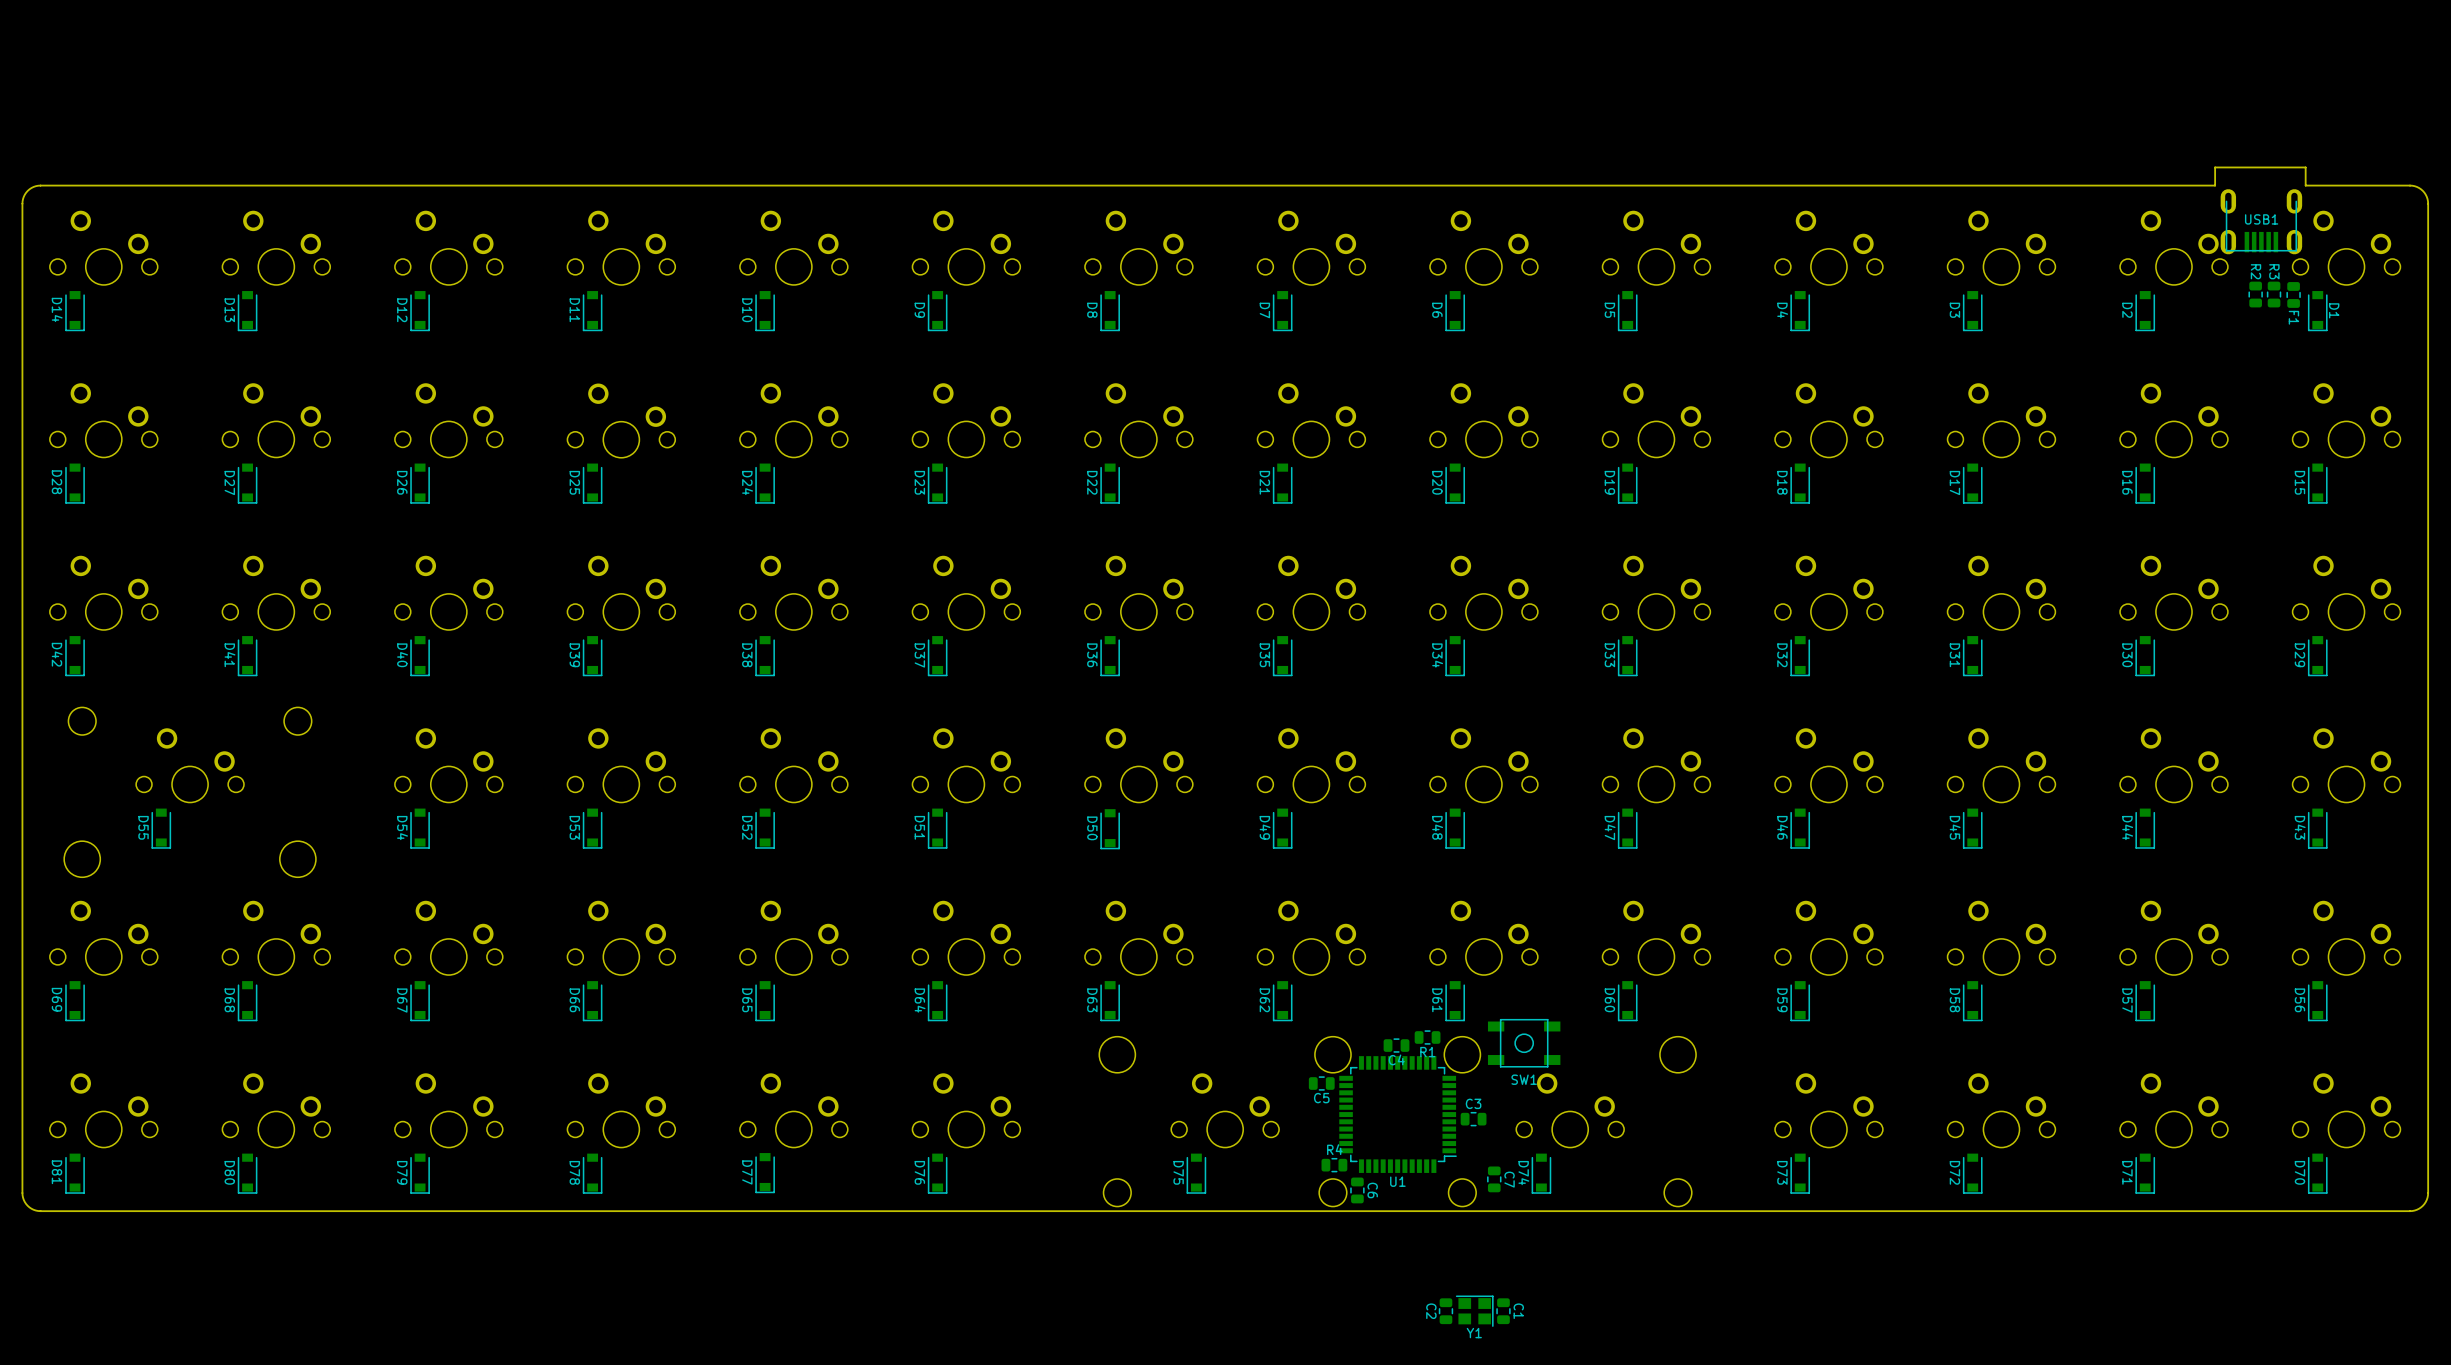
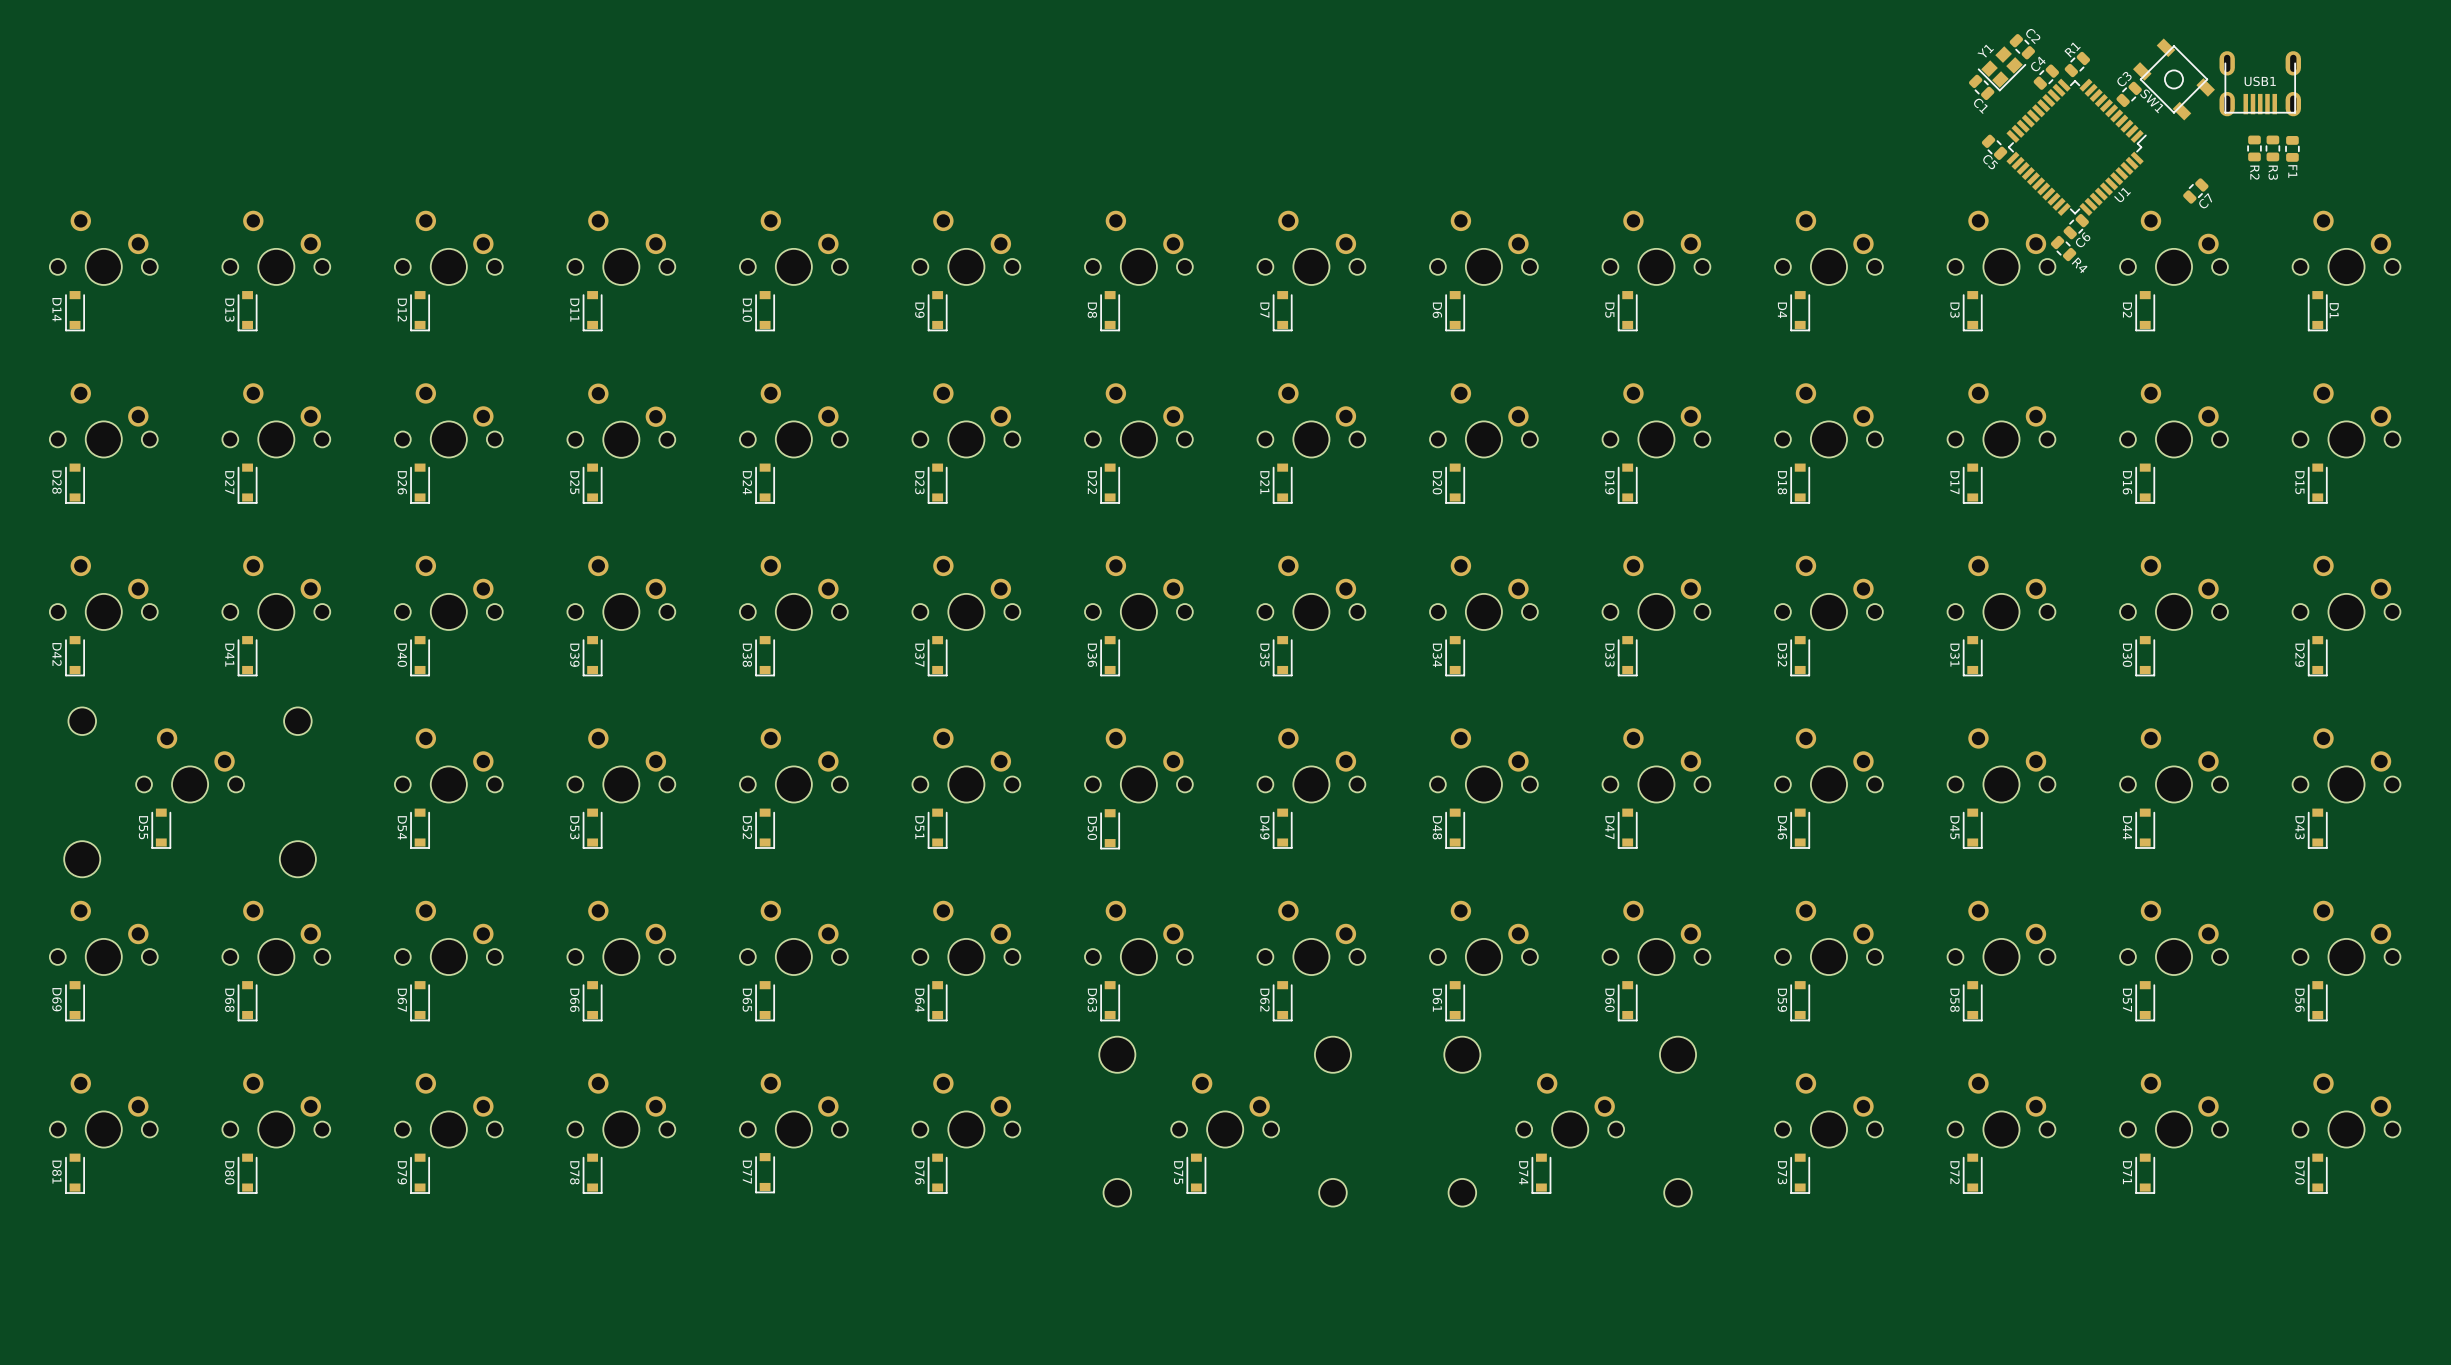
board edge: (2305, 167) (2305, 185) (2412, 185) (2422, 190) (2427, 201) (2428, 1193) (2425, 1202) (2416, 1209) (40, 1211) (29, 1207) (23, 1199) (22, 203) (26, 192) (33, 186) (2215, 185) (2215, 167) (2305, 167) -> none
USB1 position: (2261, 221) -> (2260, 83)
R2 name position: R2 (2255, 271) -> R2 (2254, 172)
R3 name position: R3 (2274, 271) -> R3 (2273, 172)
R2 position: (2255, 294) -> (2254, 148)
R3 position: (2274, 294) -> (2272, 148)
F1 position: (2293, 294) -> (2292, 148)
R1 rotation: 0° (1427, 1037) -> 45° counterclockwise (2077, 64)
R1 position: (1427, 1037) -> (2077, 64)
SW1 rotation: 0° (1524, 1043) -> 45° clockwise (2173, 79)
SW1 position: (1524, 1043) -> (2173, 79)
C4 rotation: 0° (1396, 1045) -> 45° counterclockwise (2046, 77)
C4 position: (1396, 1045) -> (2046, 77)
R1 name position: R1 (1427, 1052) -> R1 (2072, 49)
C4 name position: C4 (1396, 1059) -> C4 (2038, 63)
C5 rotation: 0° (1321, 1083) -> 45° clockwise (1994, 147)
C5 position: (1321, 1083) -> (1994, 147)
U1 rotation: 0° (1398, 1114) -> 45° counterclockwise (2076, 147)
U1 position: (1398, 1114) -> (2076, 147)
C3 rotation: 0° (1473, 1119) -> 45° counterclockwise (2129, 94)
C3 position: (1473, 1119) -> (2129, 94)
R4 name position: R4 (1334, 1149) -> R4 (2079, 265)
R4 rotation: 0° (1334, 1165) -> 45° clockwise (2063, 248)
R4 position: (1334, 1165) -> (2063, 248)
C7 rotation: 0° (1494, 1179) -> 45° clockwise (2195, 191)
C7 position: (1494, 1179) -> (2195, 191)
C6 rotation: 0° (1357, 1190) -> 45° clockwise (2076, 226)
C6 position: (1357, 1190) -> (2076, 226)
C2 name position: C2 (1431, 1311) -> C2 (2033, 36)
C2 rotation: 0° (1445, 1311) -> 45° counterclockwise (2022, 46)
C2 position: (1445, 1311) -> (2022, 46)
Y1 rotation: 0° (1474, 1311) -> 135° clockwise (2002, 68)
Y1 position: (1474, 1311) -> (2002, 68)
C1 rotation: 0° (1503, 1311) -> 45° counterclockwise (1981, 87)
C1 position: (1503, 1311) -> (1981, 87)
C1 name position: C1 (1518, 1311) -> C1 (1980, 106)

